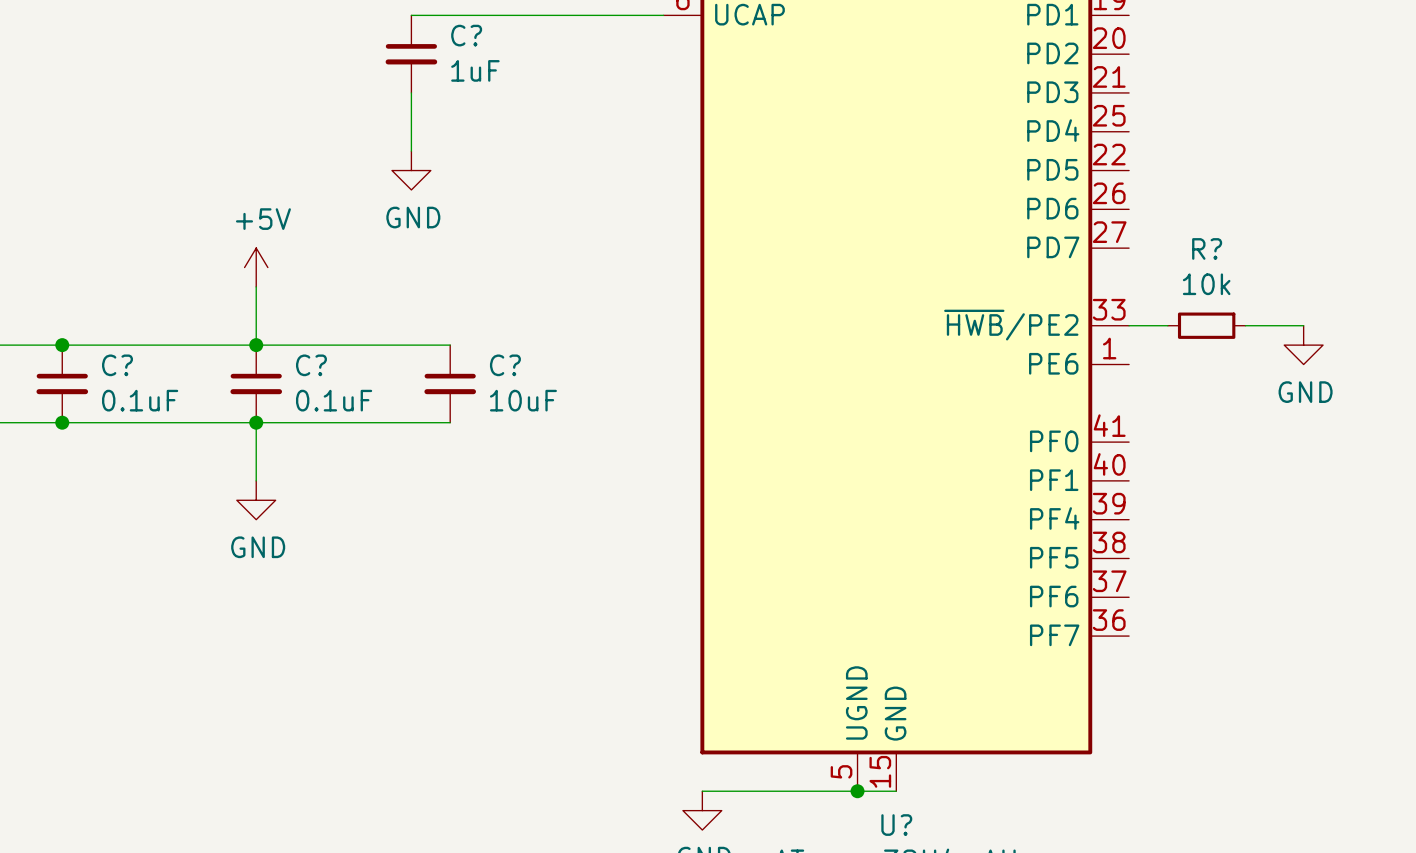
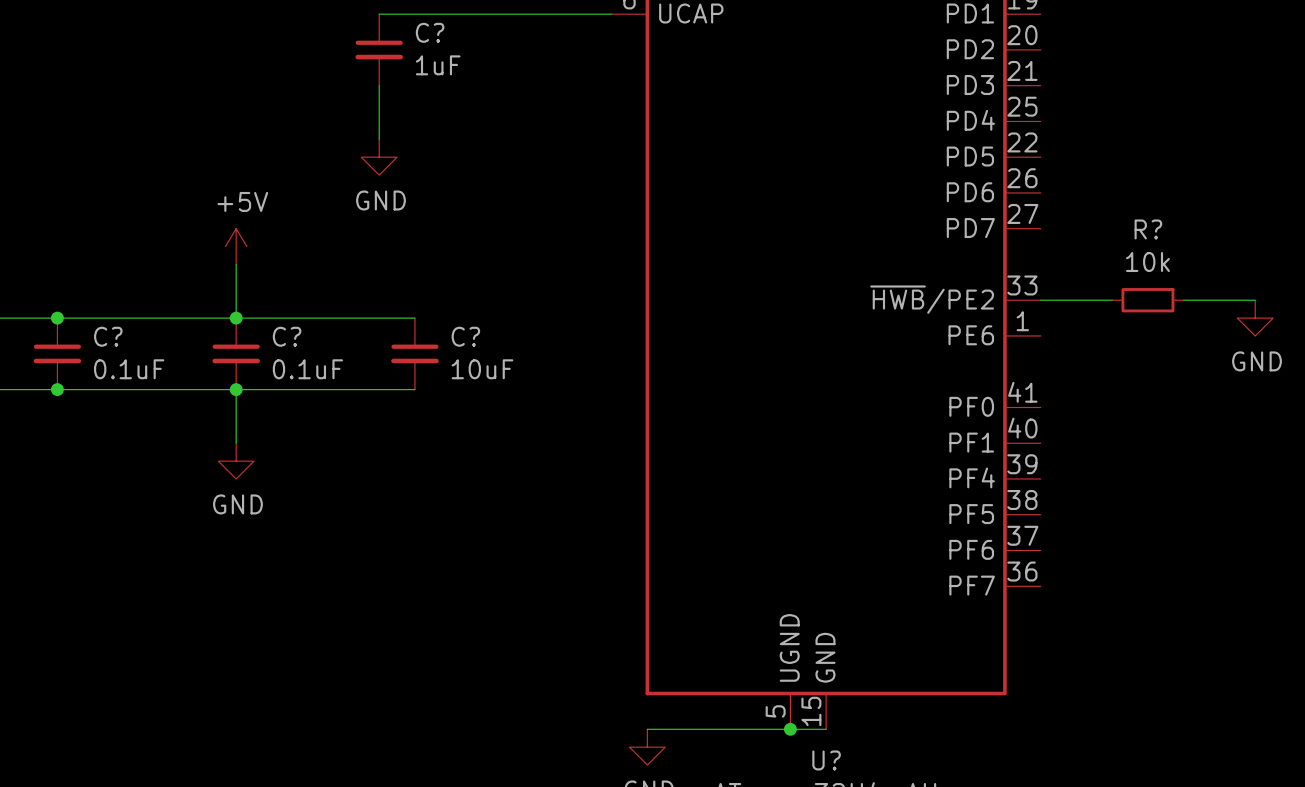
R? position: (1206, 325) -> (1147, 300)
wire: (1245, 325) (1284, 325) -> (1076, 300) (1112, 300)
wire: none -> (1201, 300) (1255, 300)
power symbol position: GND (1303, 345) -> GND (1255, 318)

